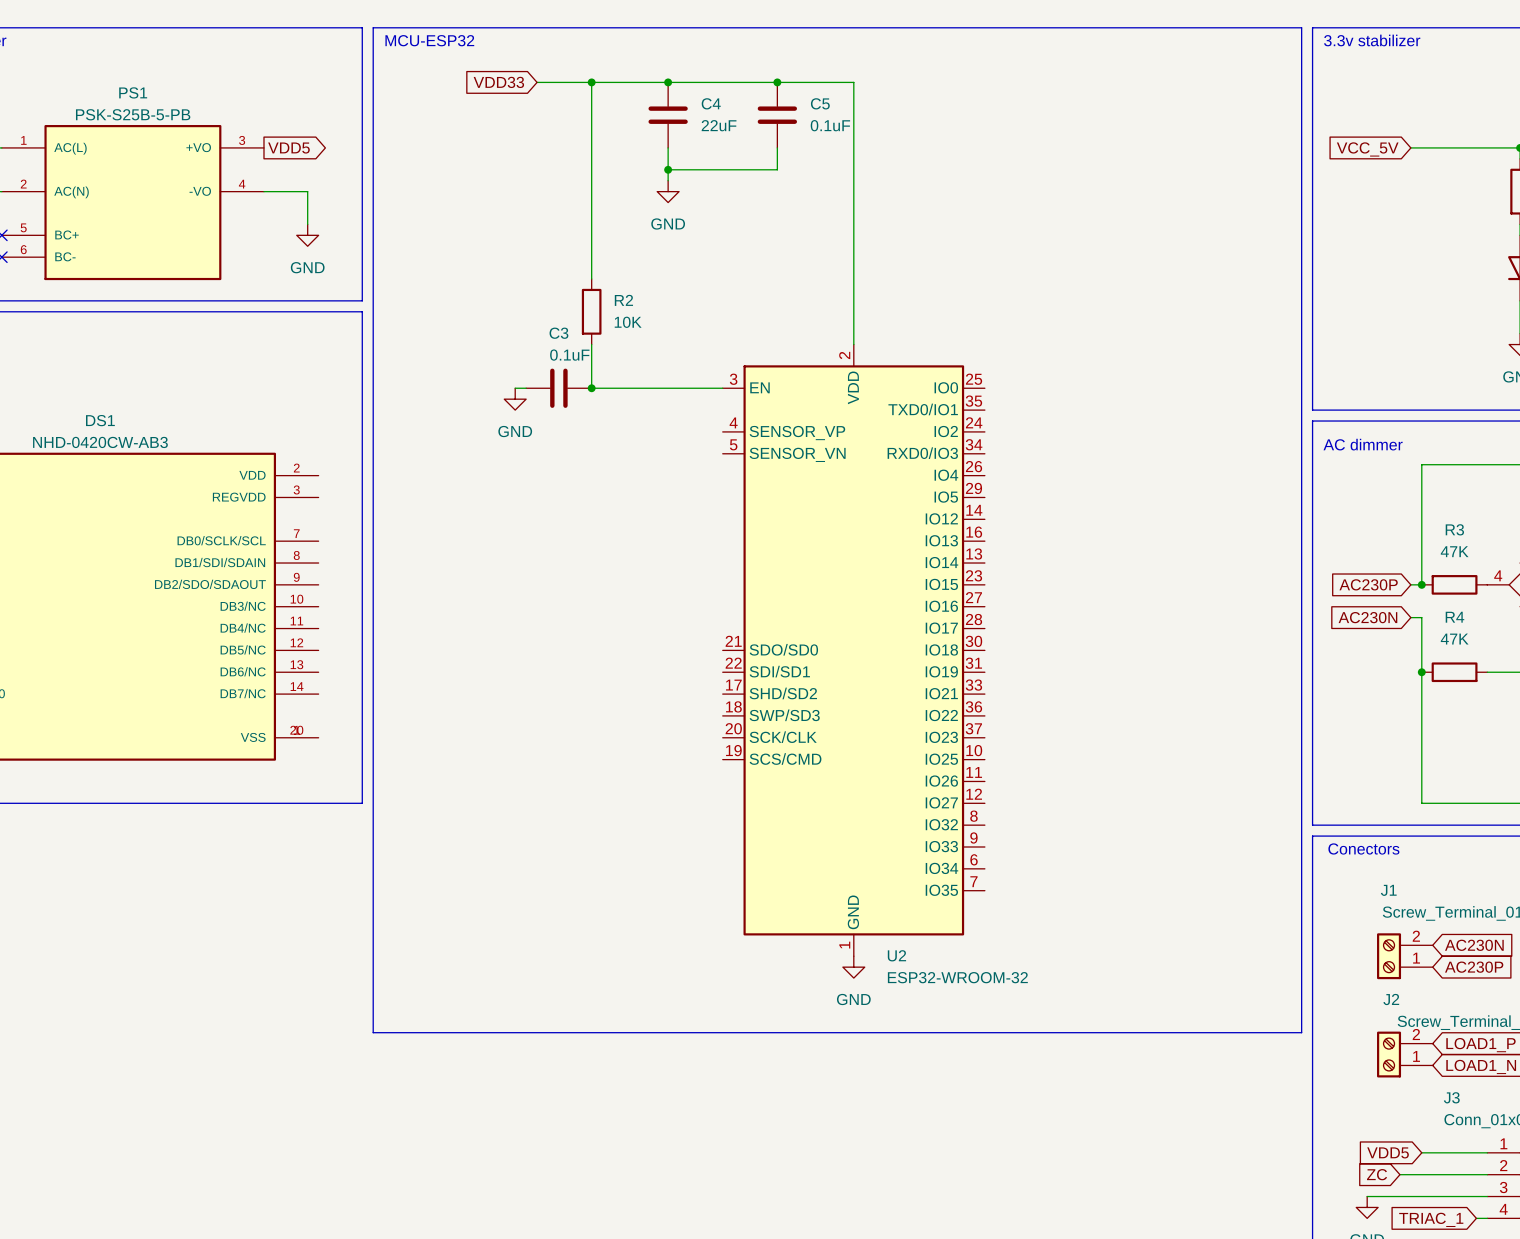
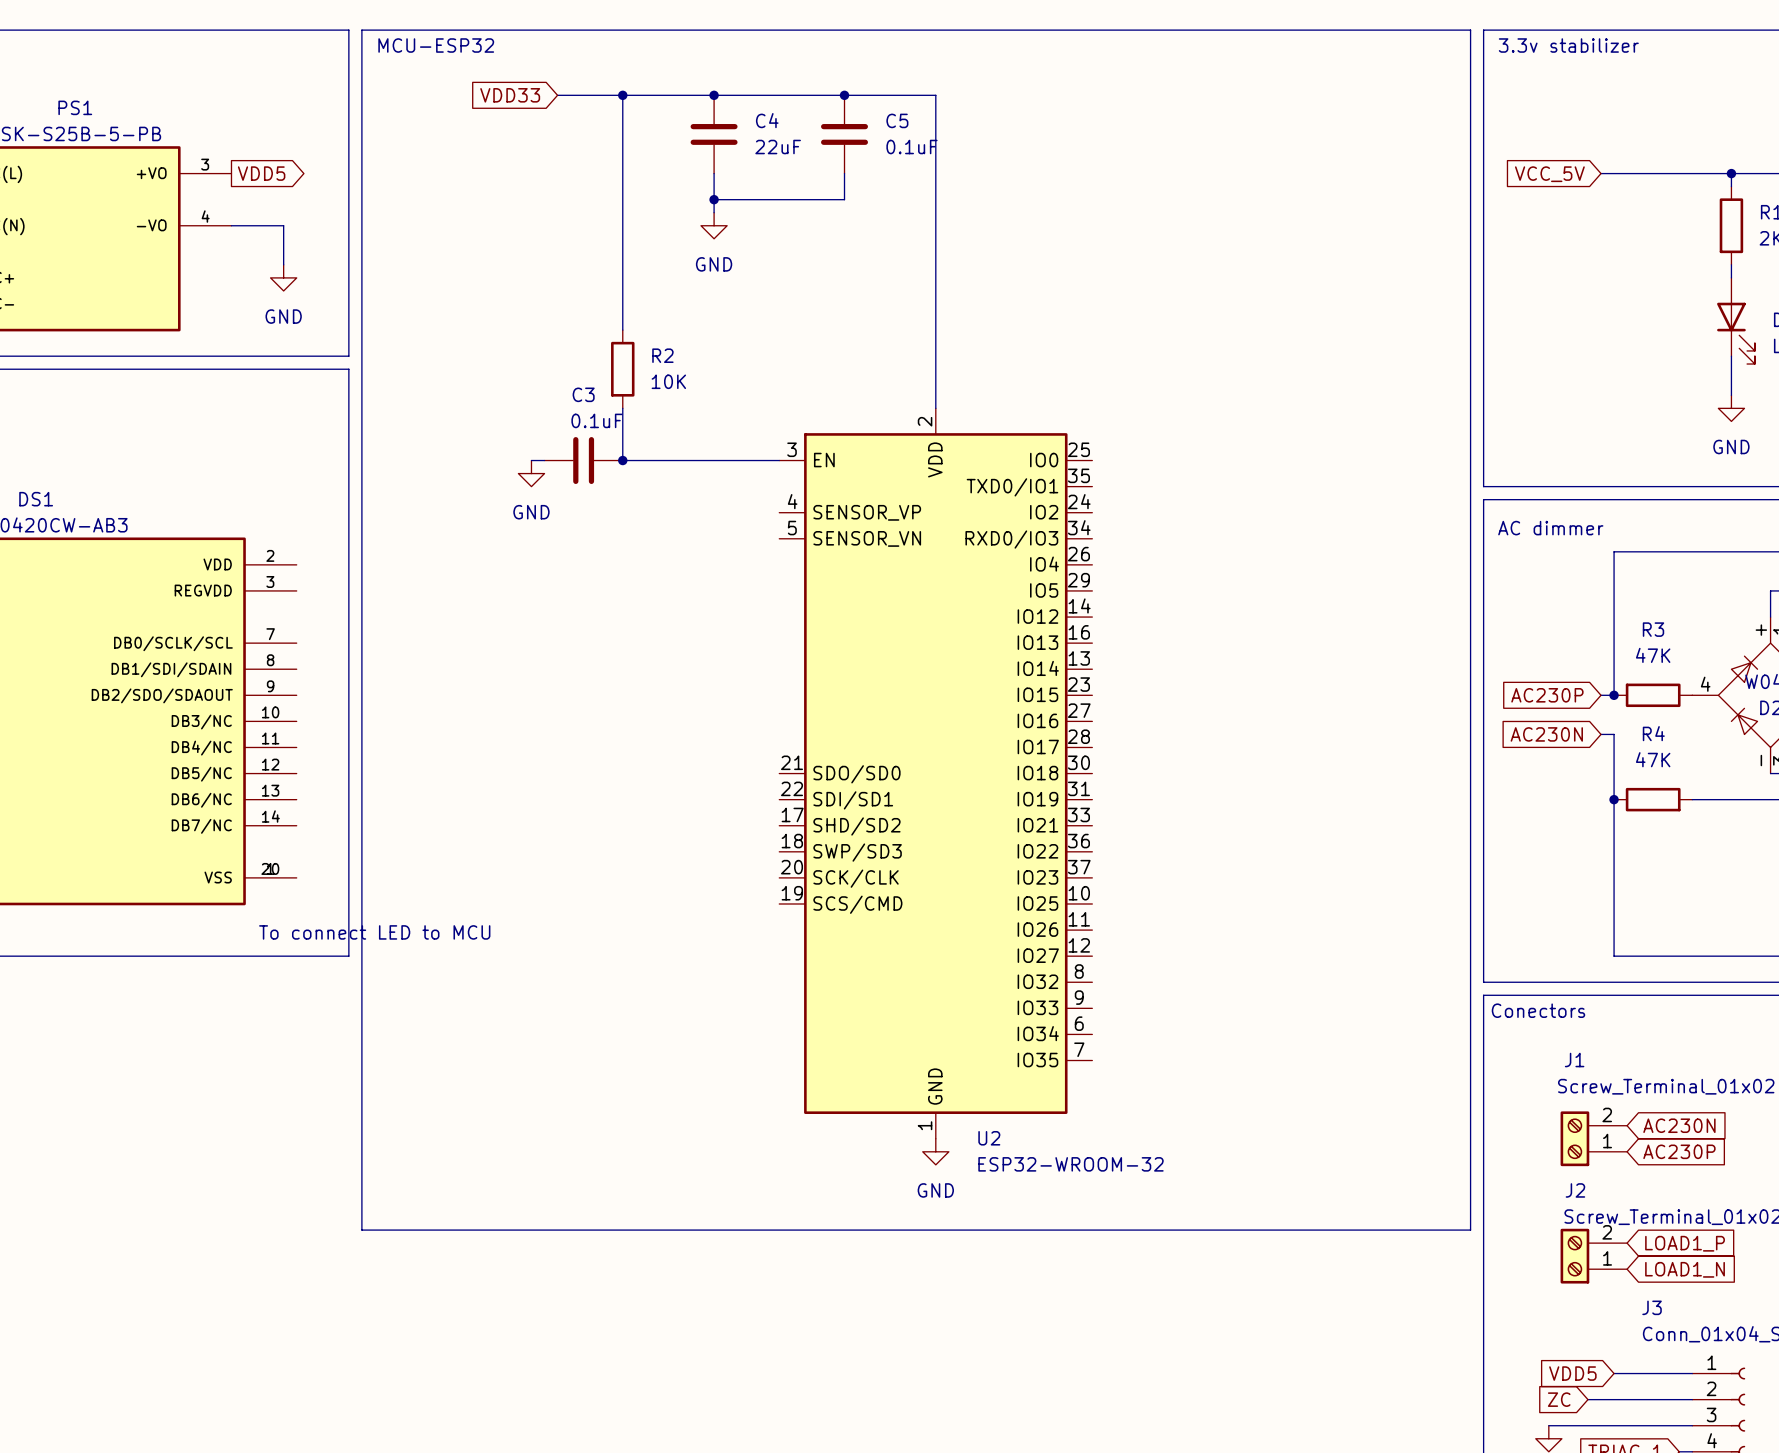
text: none -> To connect LED to MCU (374, 932)

